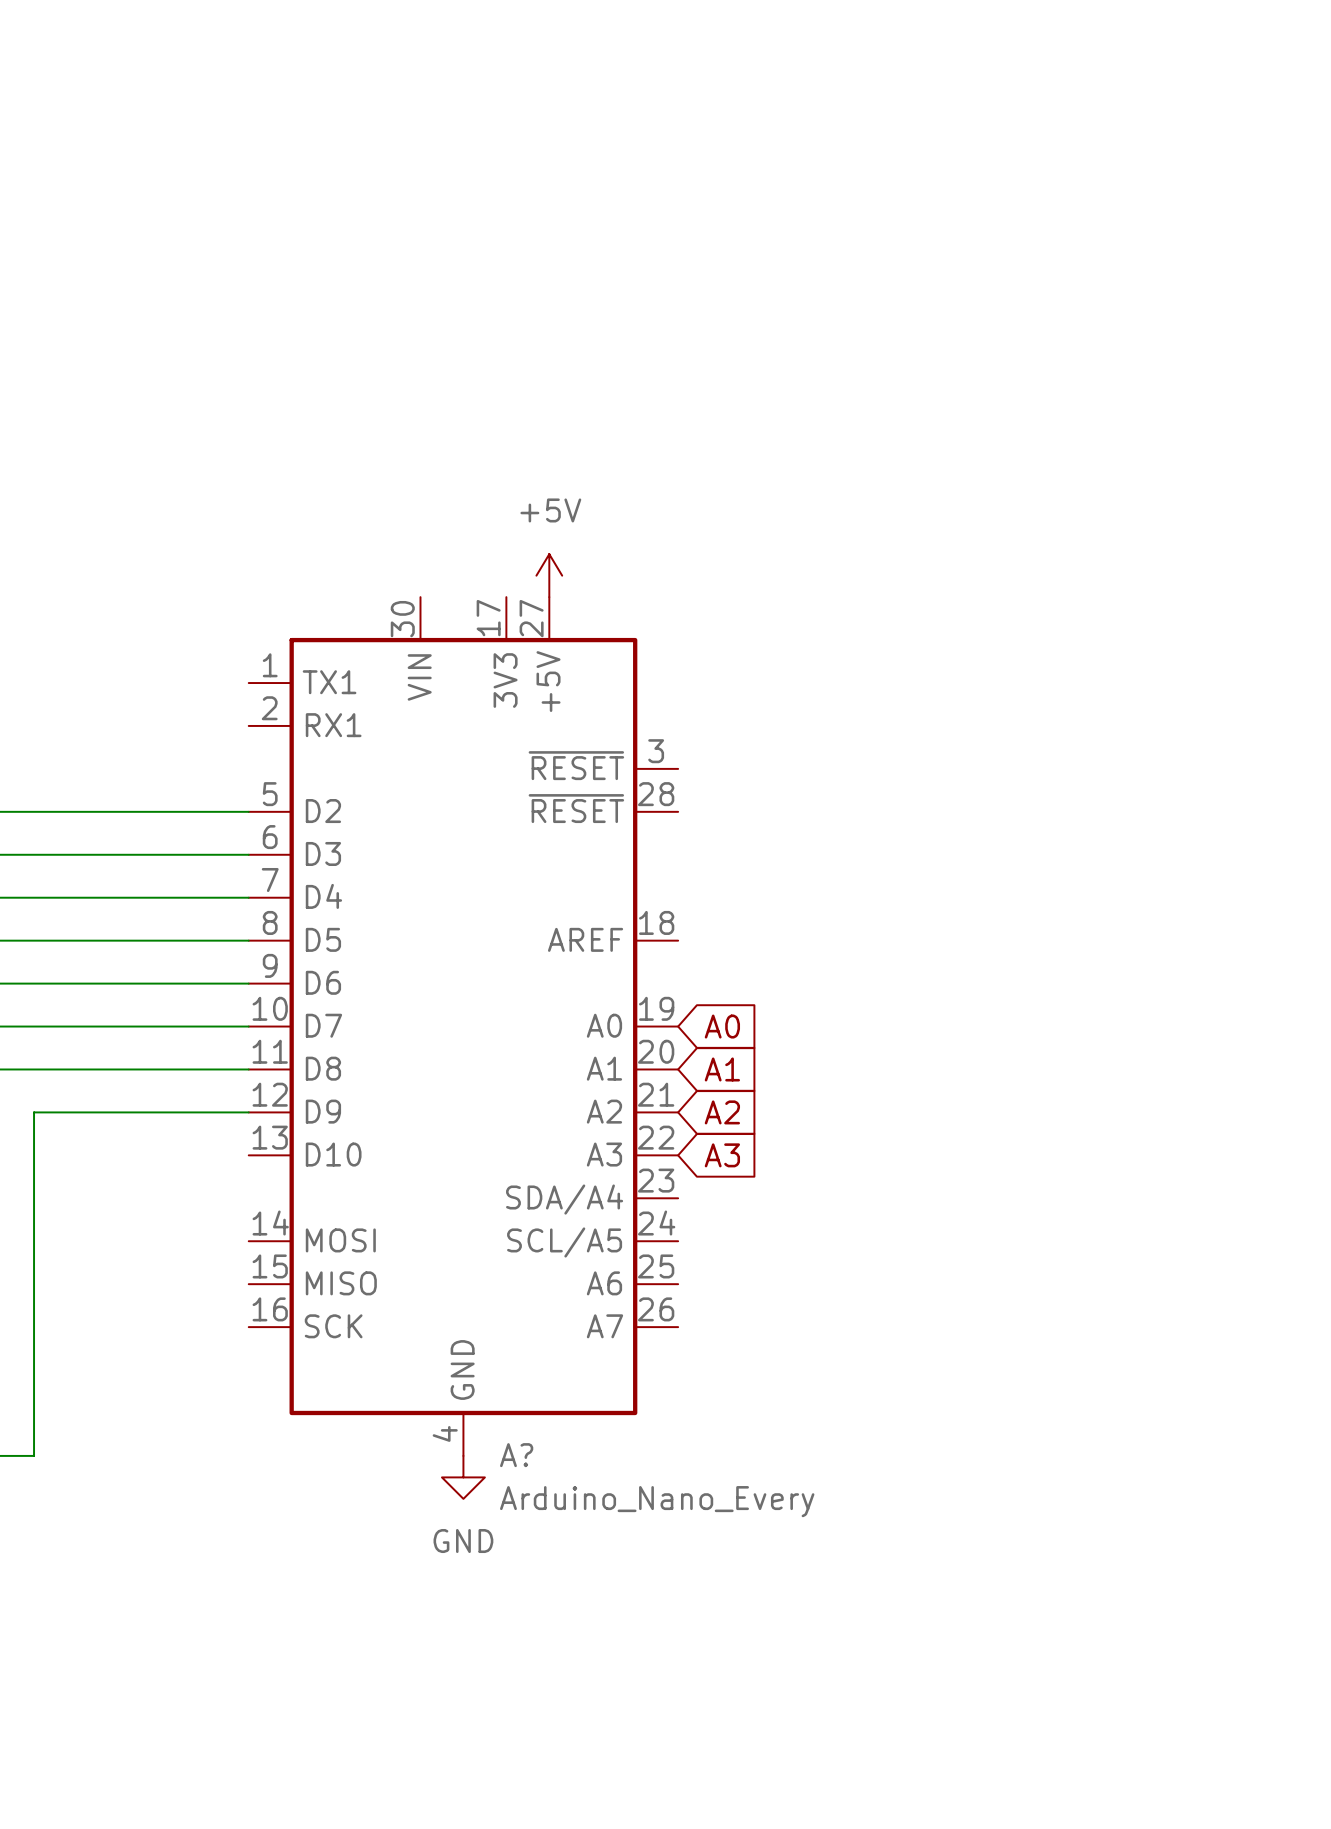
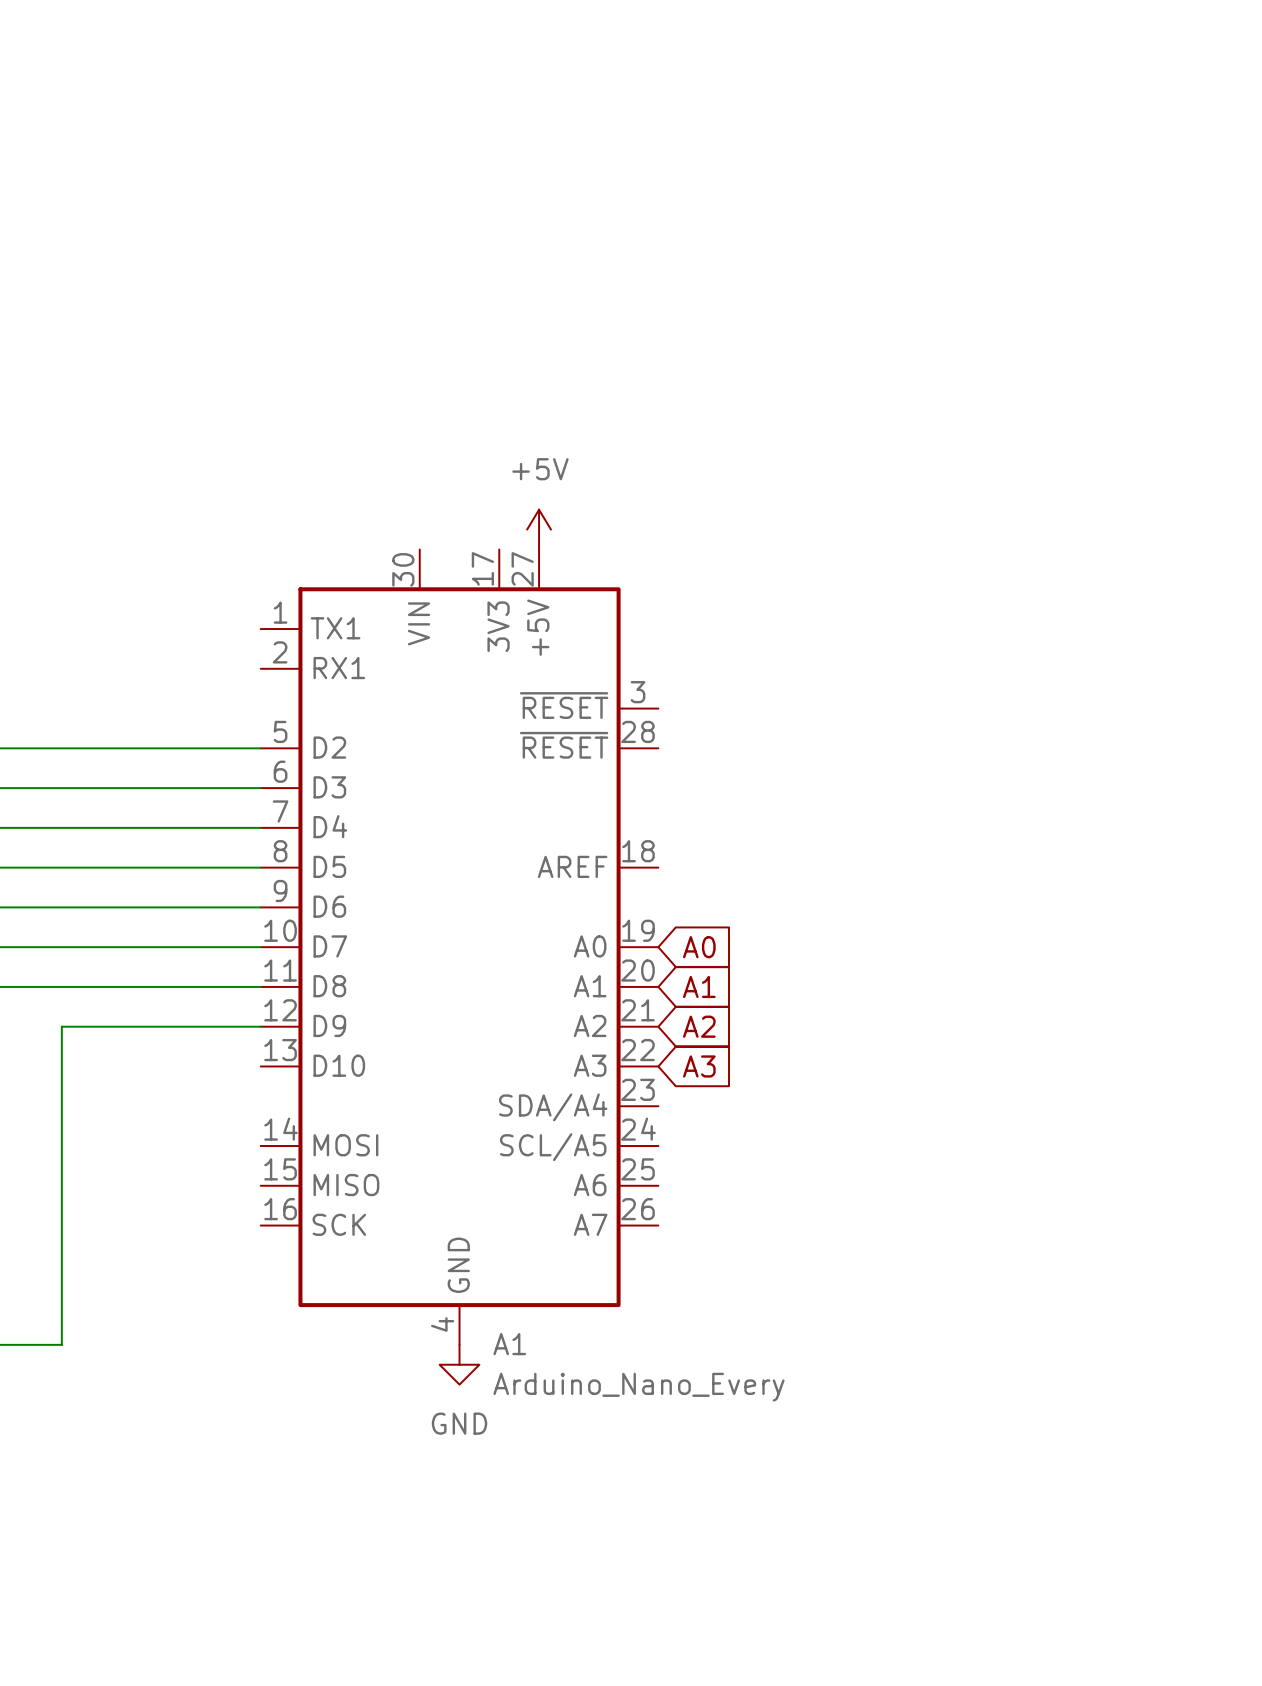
A? name: A? (516, 1455) -> A1 (509, 1344)

